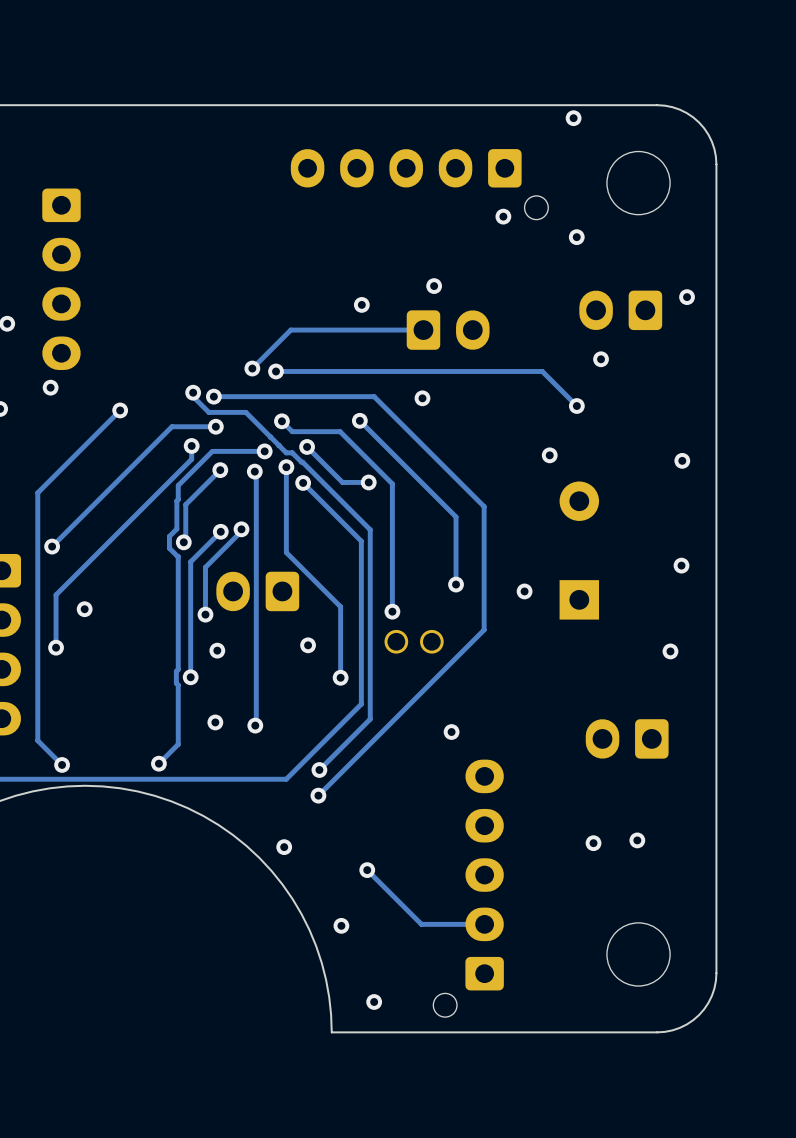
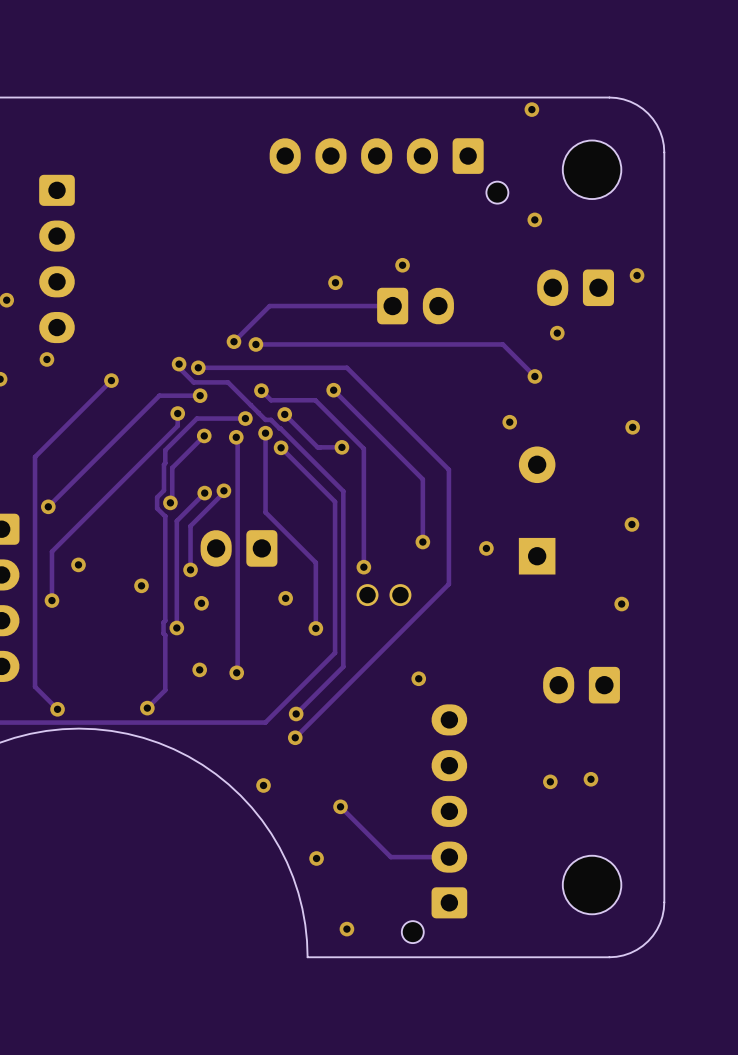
via: (503, 216) -> none
via: (422, 398) -> none
via: none -> (141, 585)

